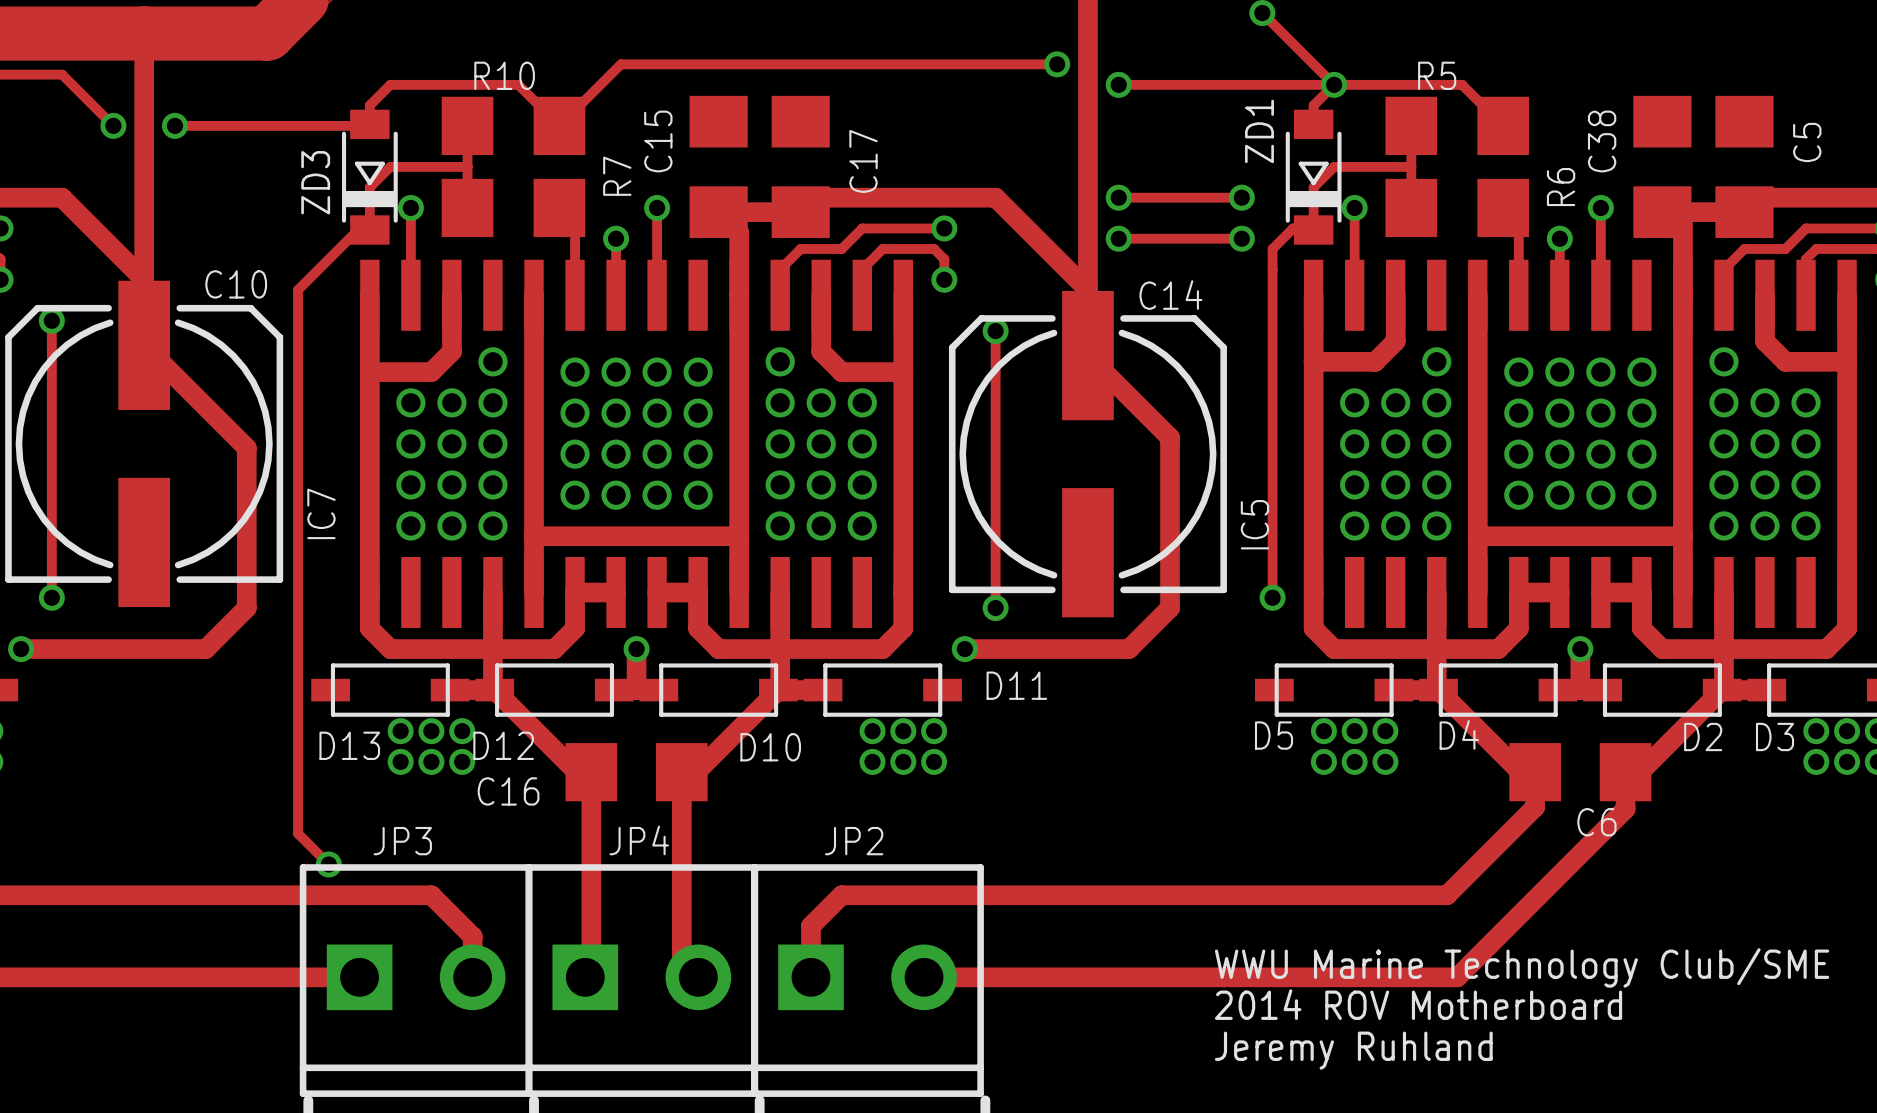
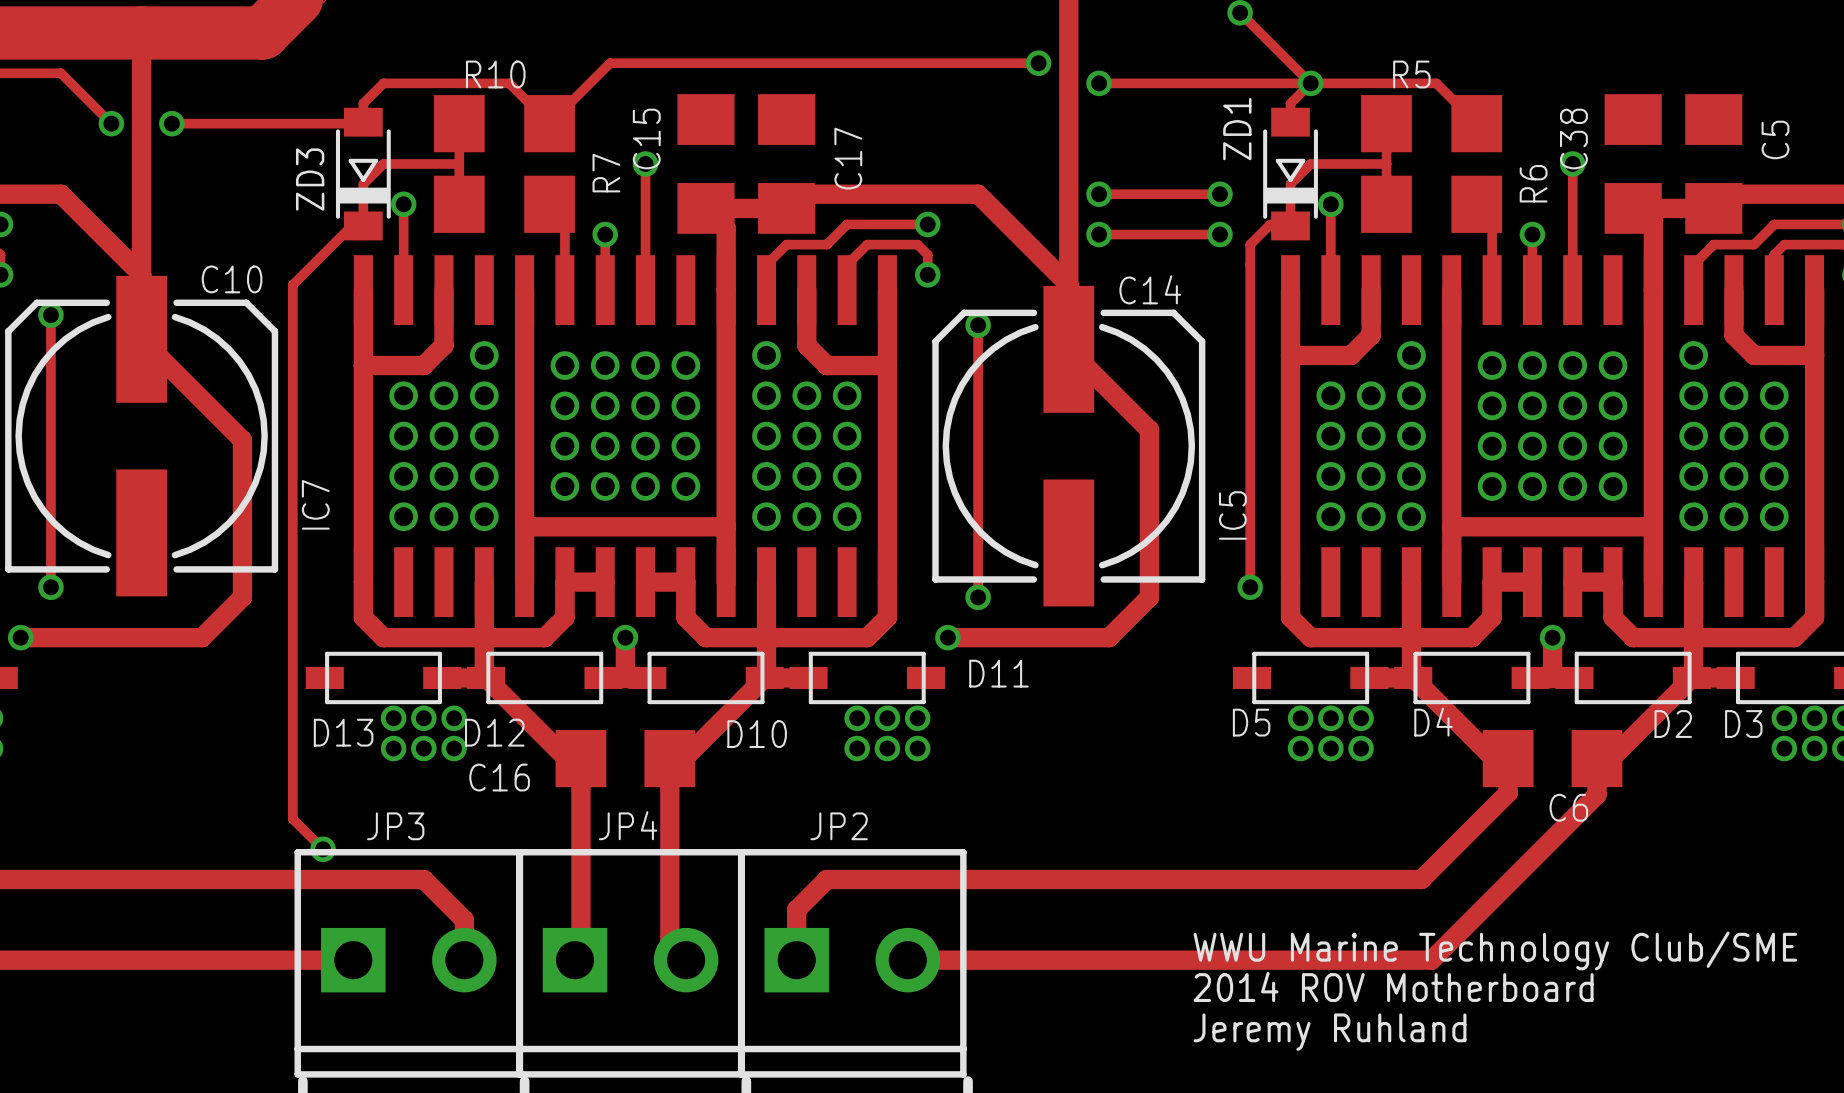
track: none -> (645, 163) (645, 204)
track: none -> (1572, 163) (1572, 204)
via position: (657, 207) -> (645, 163)
via position: (1600, 207) -> (1572, 163)

